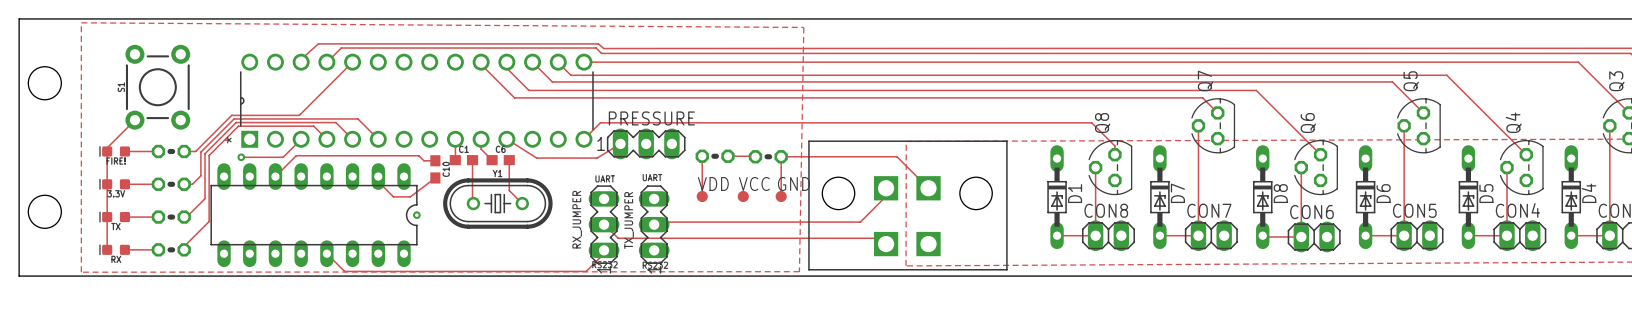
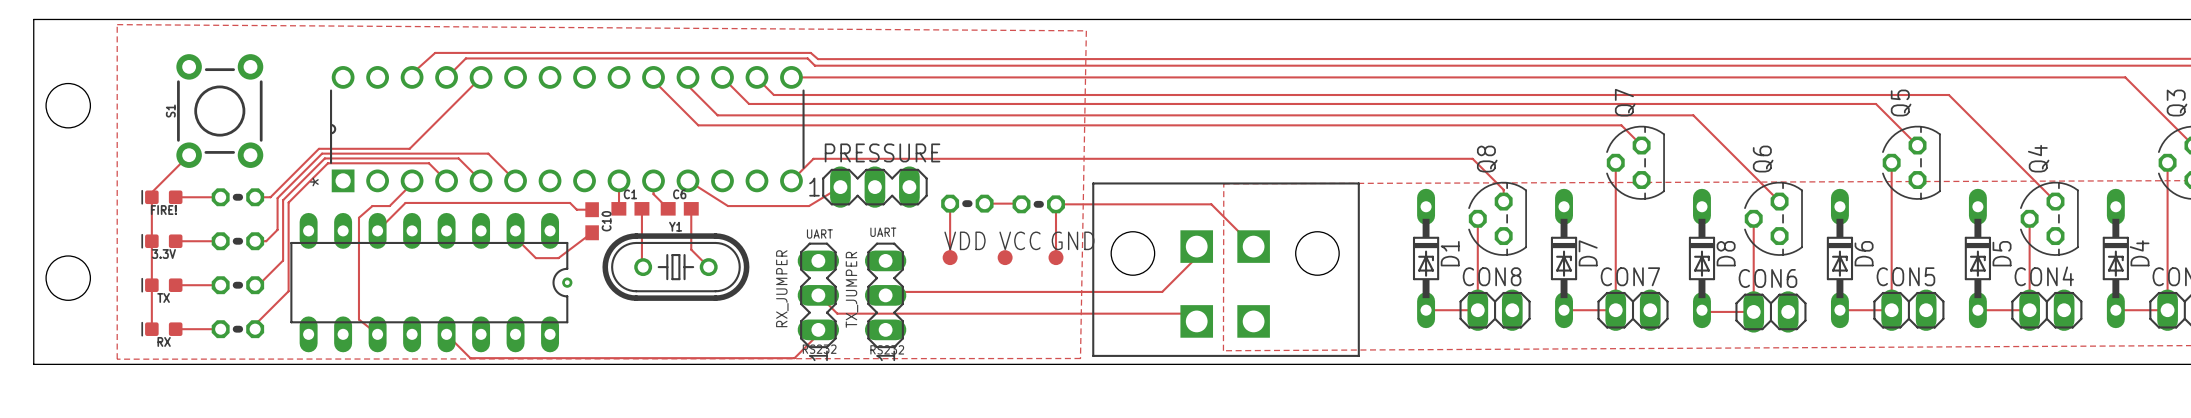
track: (301, 139) (283, 157) (241, 157) -> (412, 180) (412, 183) (389, 206) (372, 206) (358, 217) (358, 319) (377, 334)
via: (241, 157) -> none

